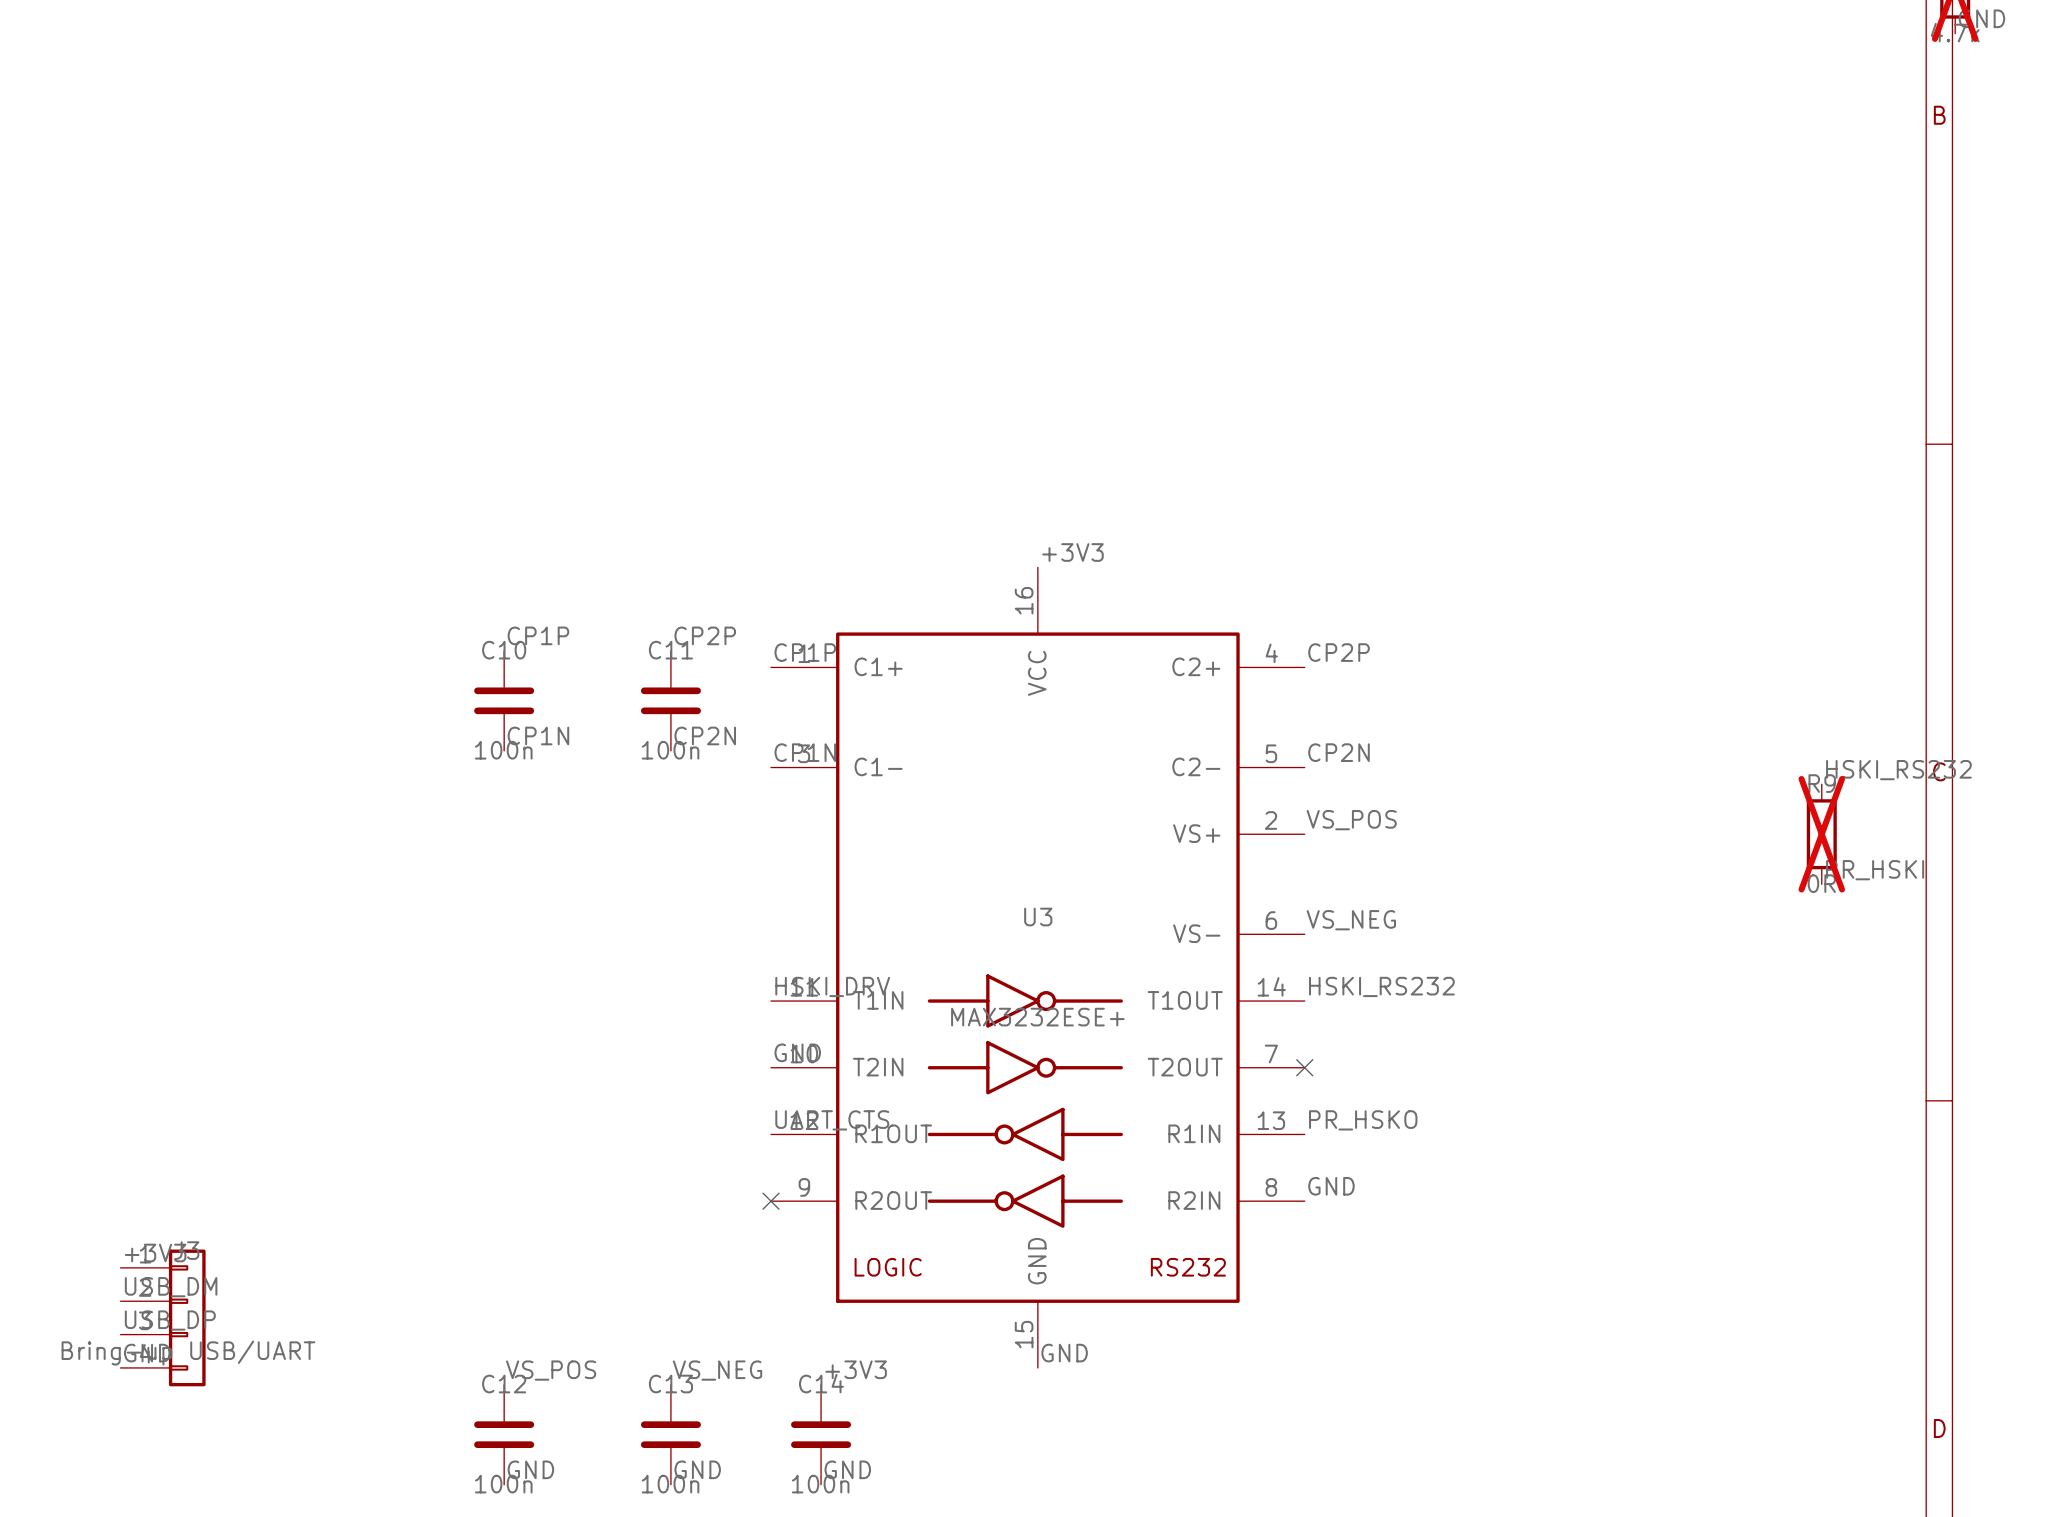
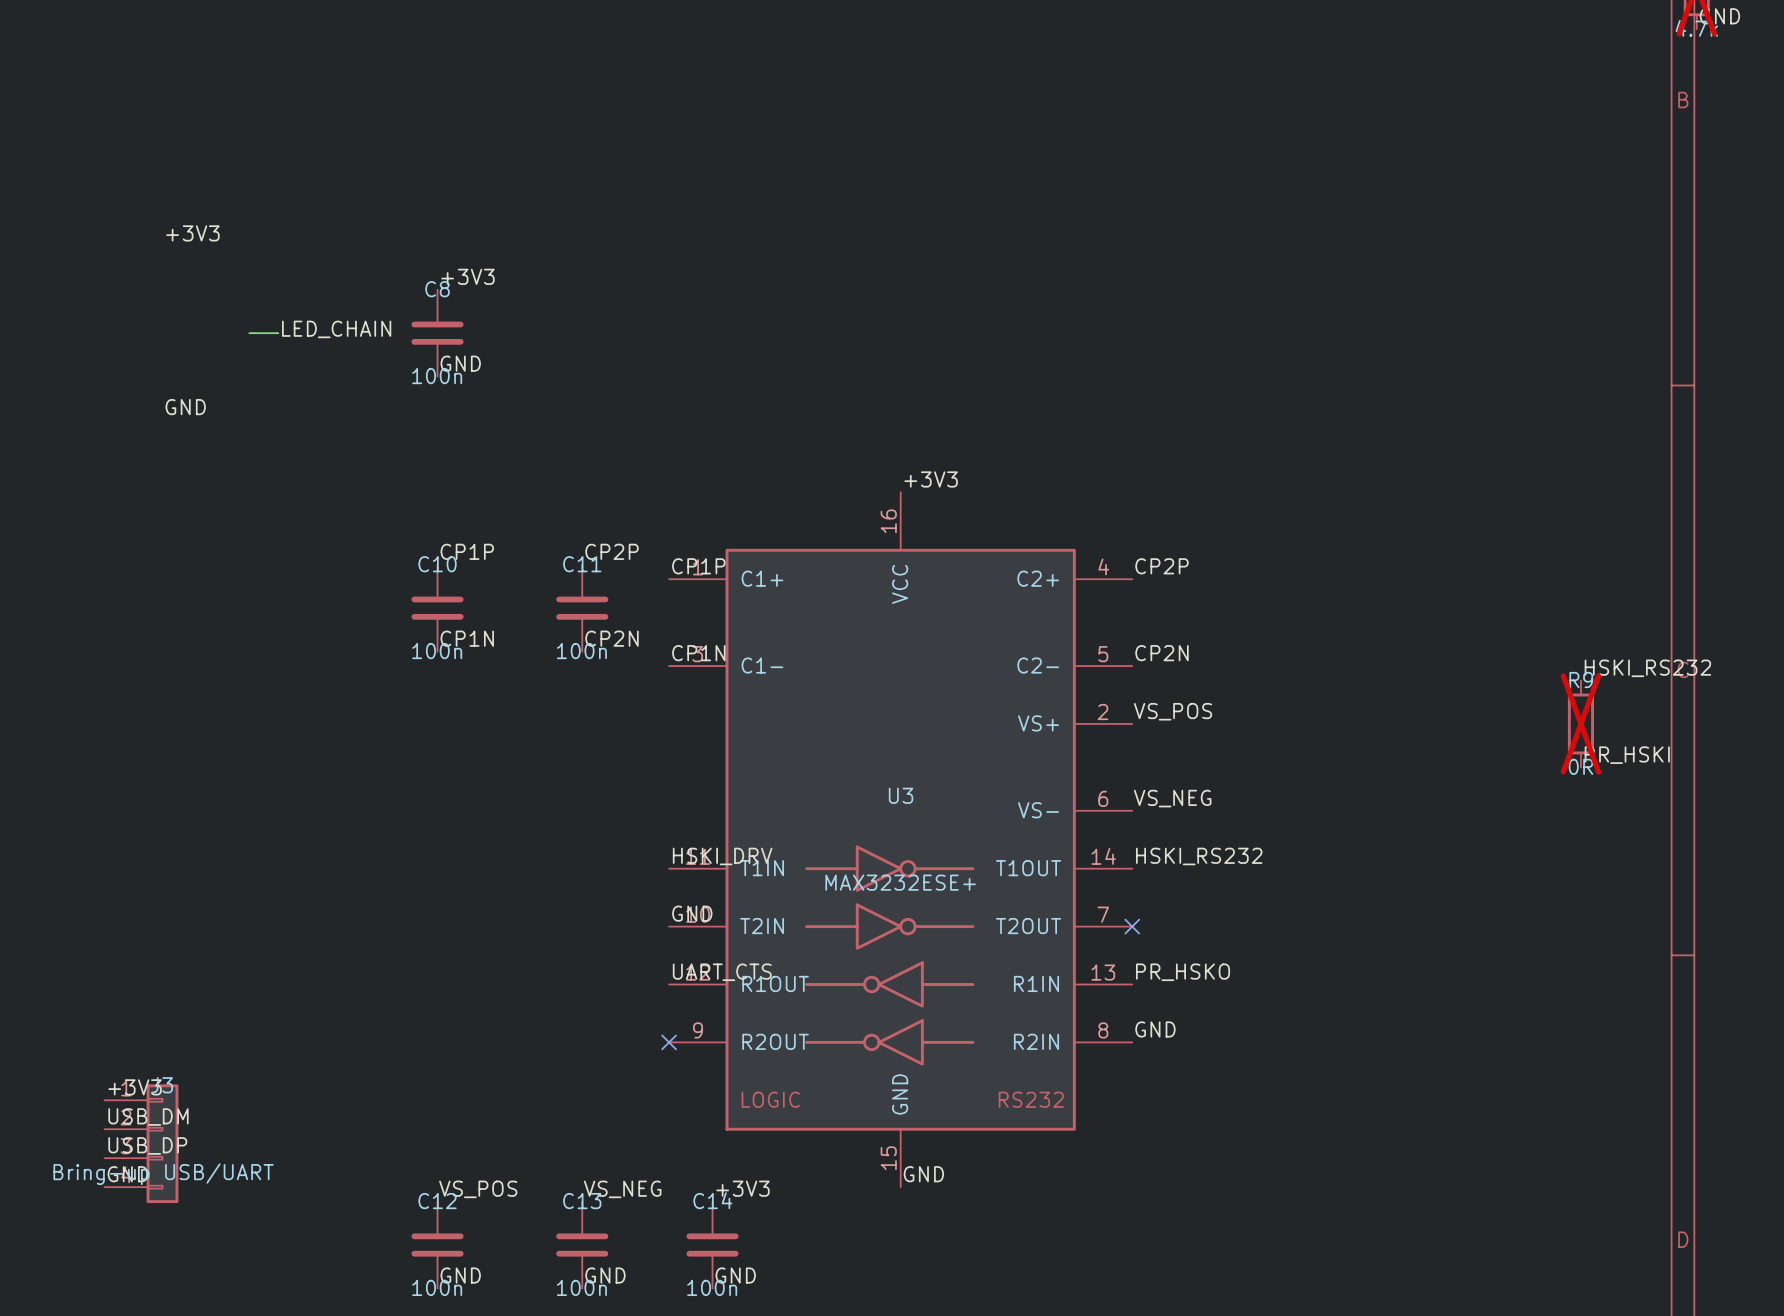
label: none -> +3V3 (192, 233)
label: none -> +3V3 (467, 276)
label: none -> LED_CHAIN (336, 329)
wire: none -> (249, 333) (278, 333)
C8: none -> 100n (437, 333)
label: none -> GND (460, 363)
label: none -> GND (185, 407)

